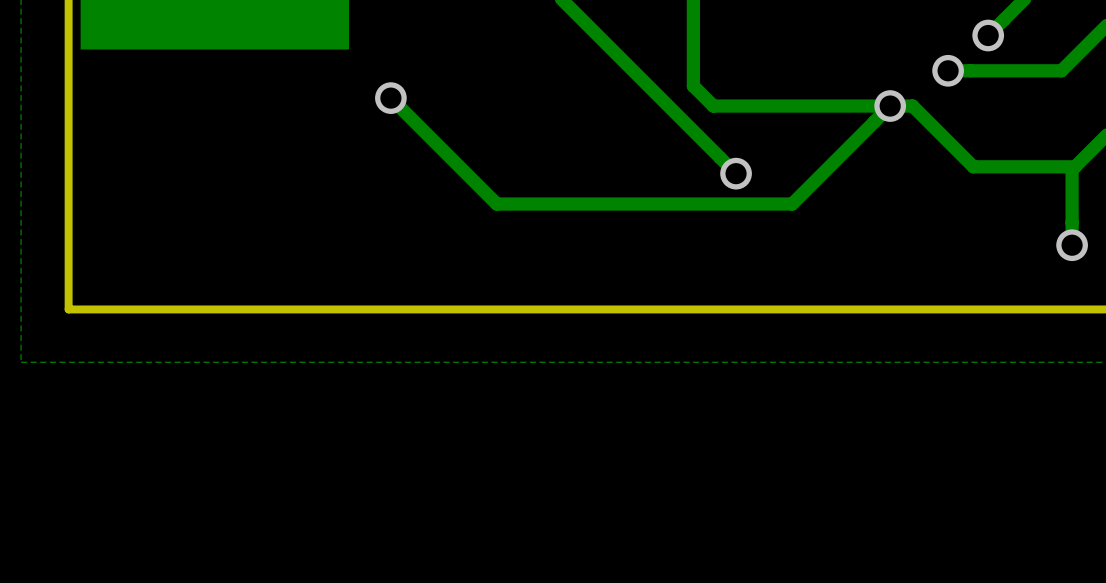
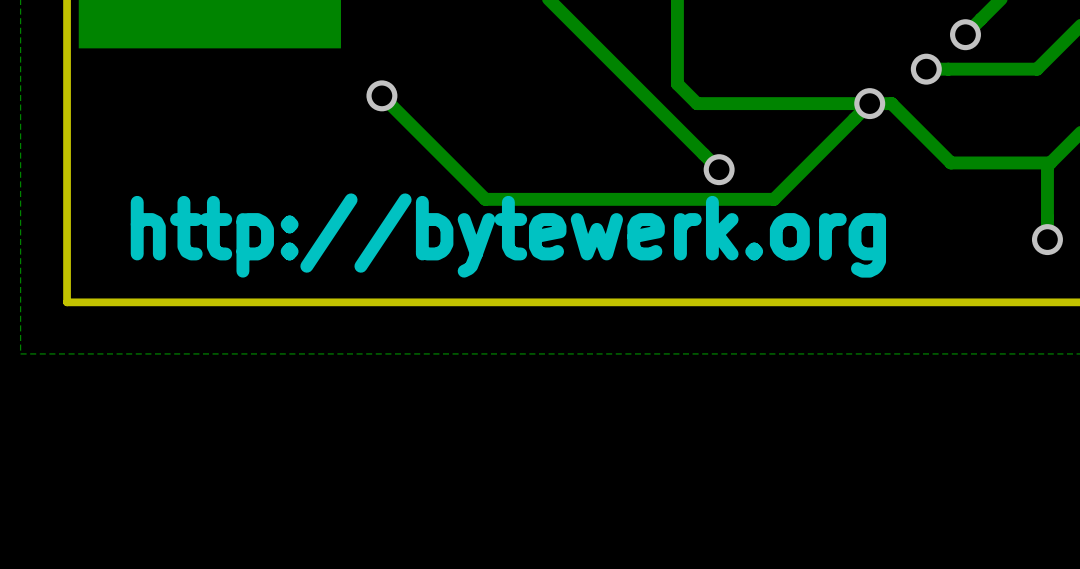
text: none -> http://bytewerk.org (508, 235)

